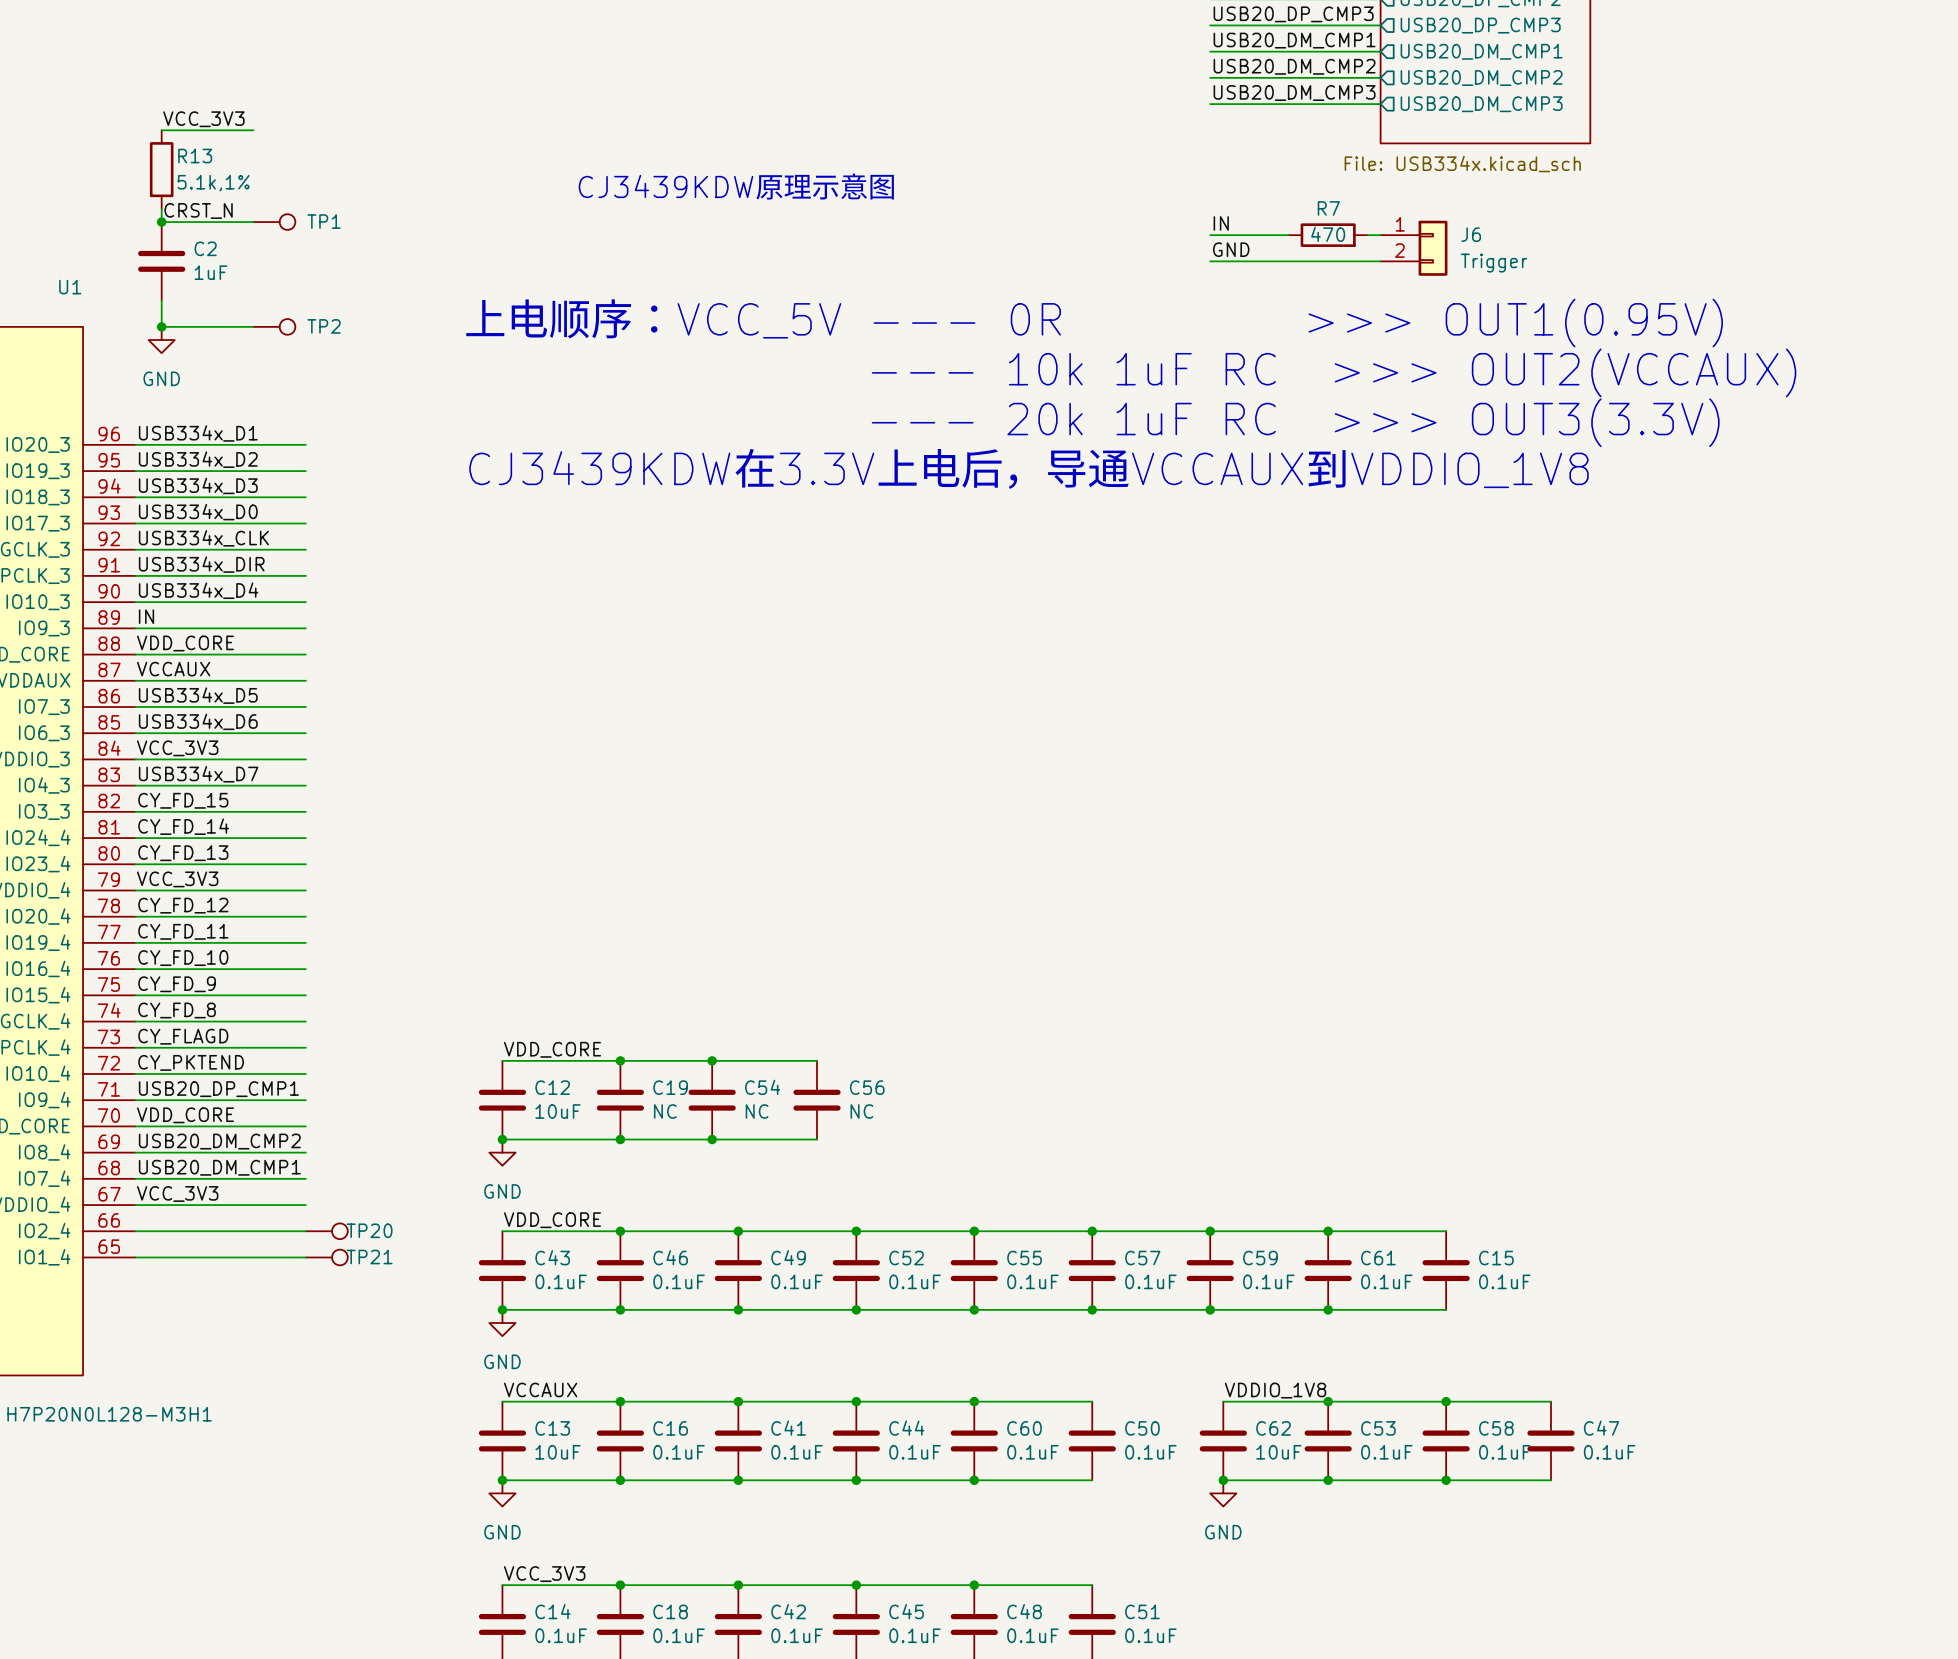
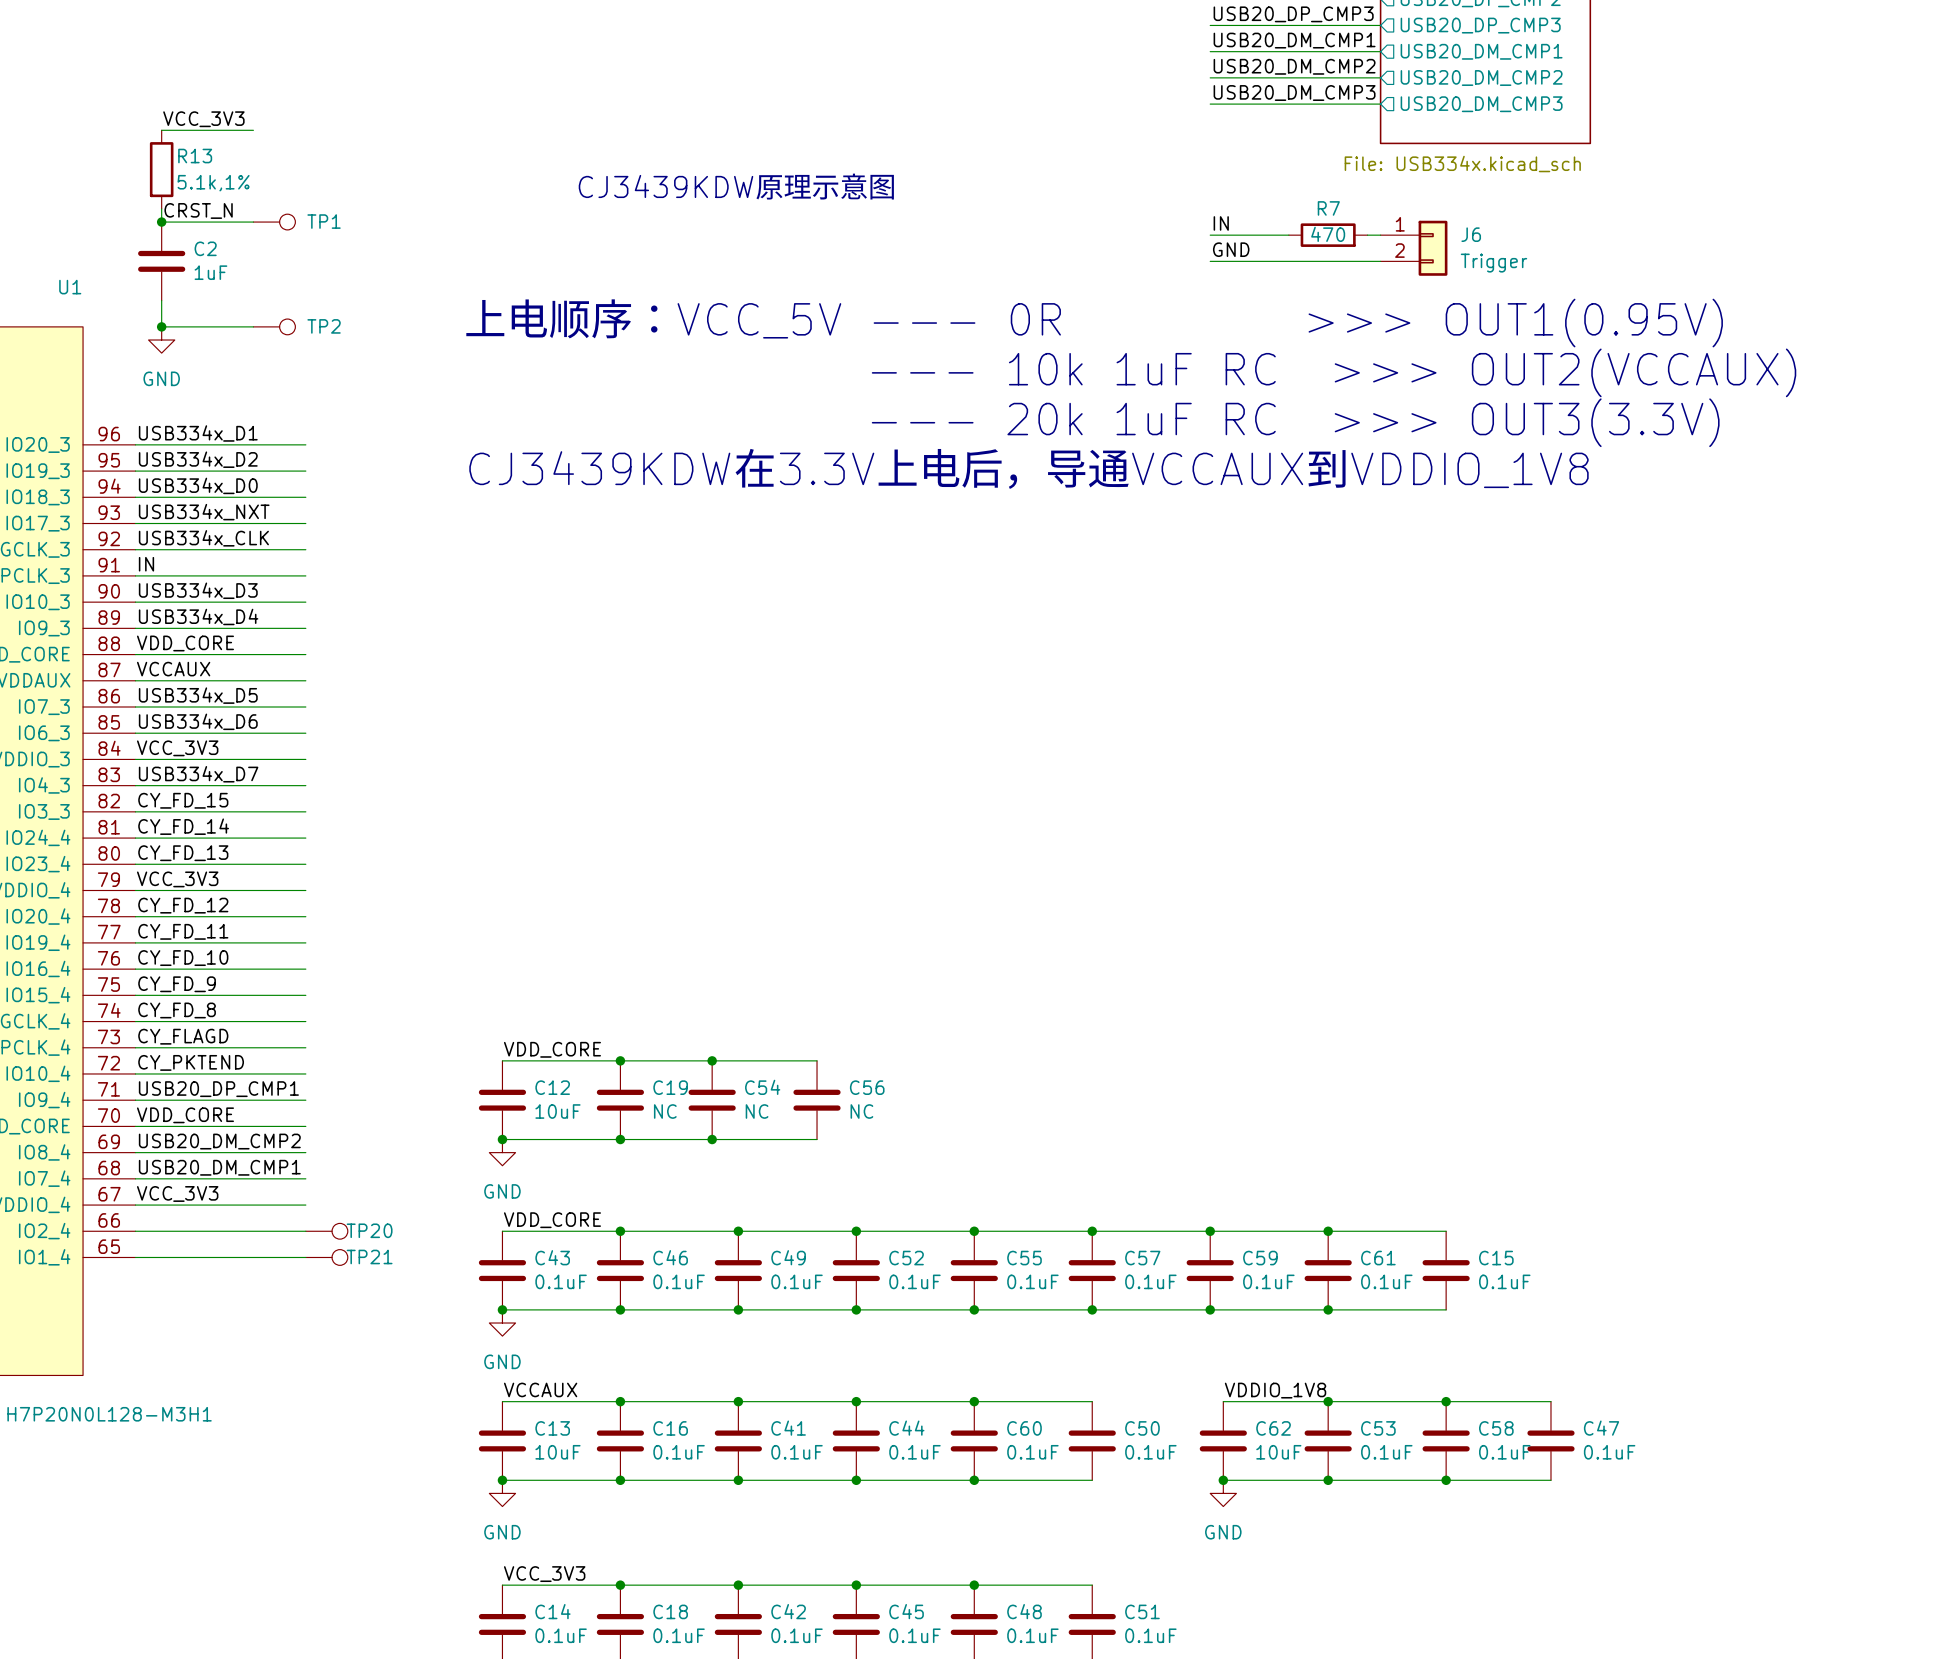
label: USB334x_D3 (198, 485) -> USB334x_D0 (198, 485)
label: USB334x_D0 (198, 512) -> USB334x_NXT (204, 512)
label: USB334x_DIR (201, 564) -> IN (146, 564)
label: USB334x_D4 (198, 590) -> USB334x_D3 (198, 590)
label: IN (146, 616) -> USB334x_D4 (198, 616)

